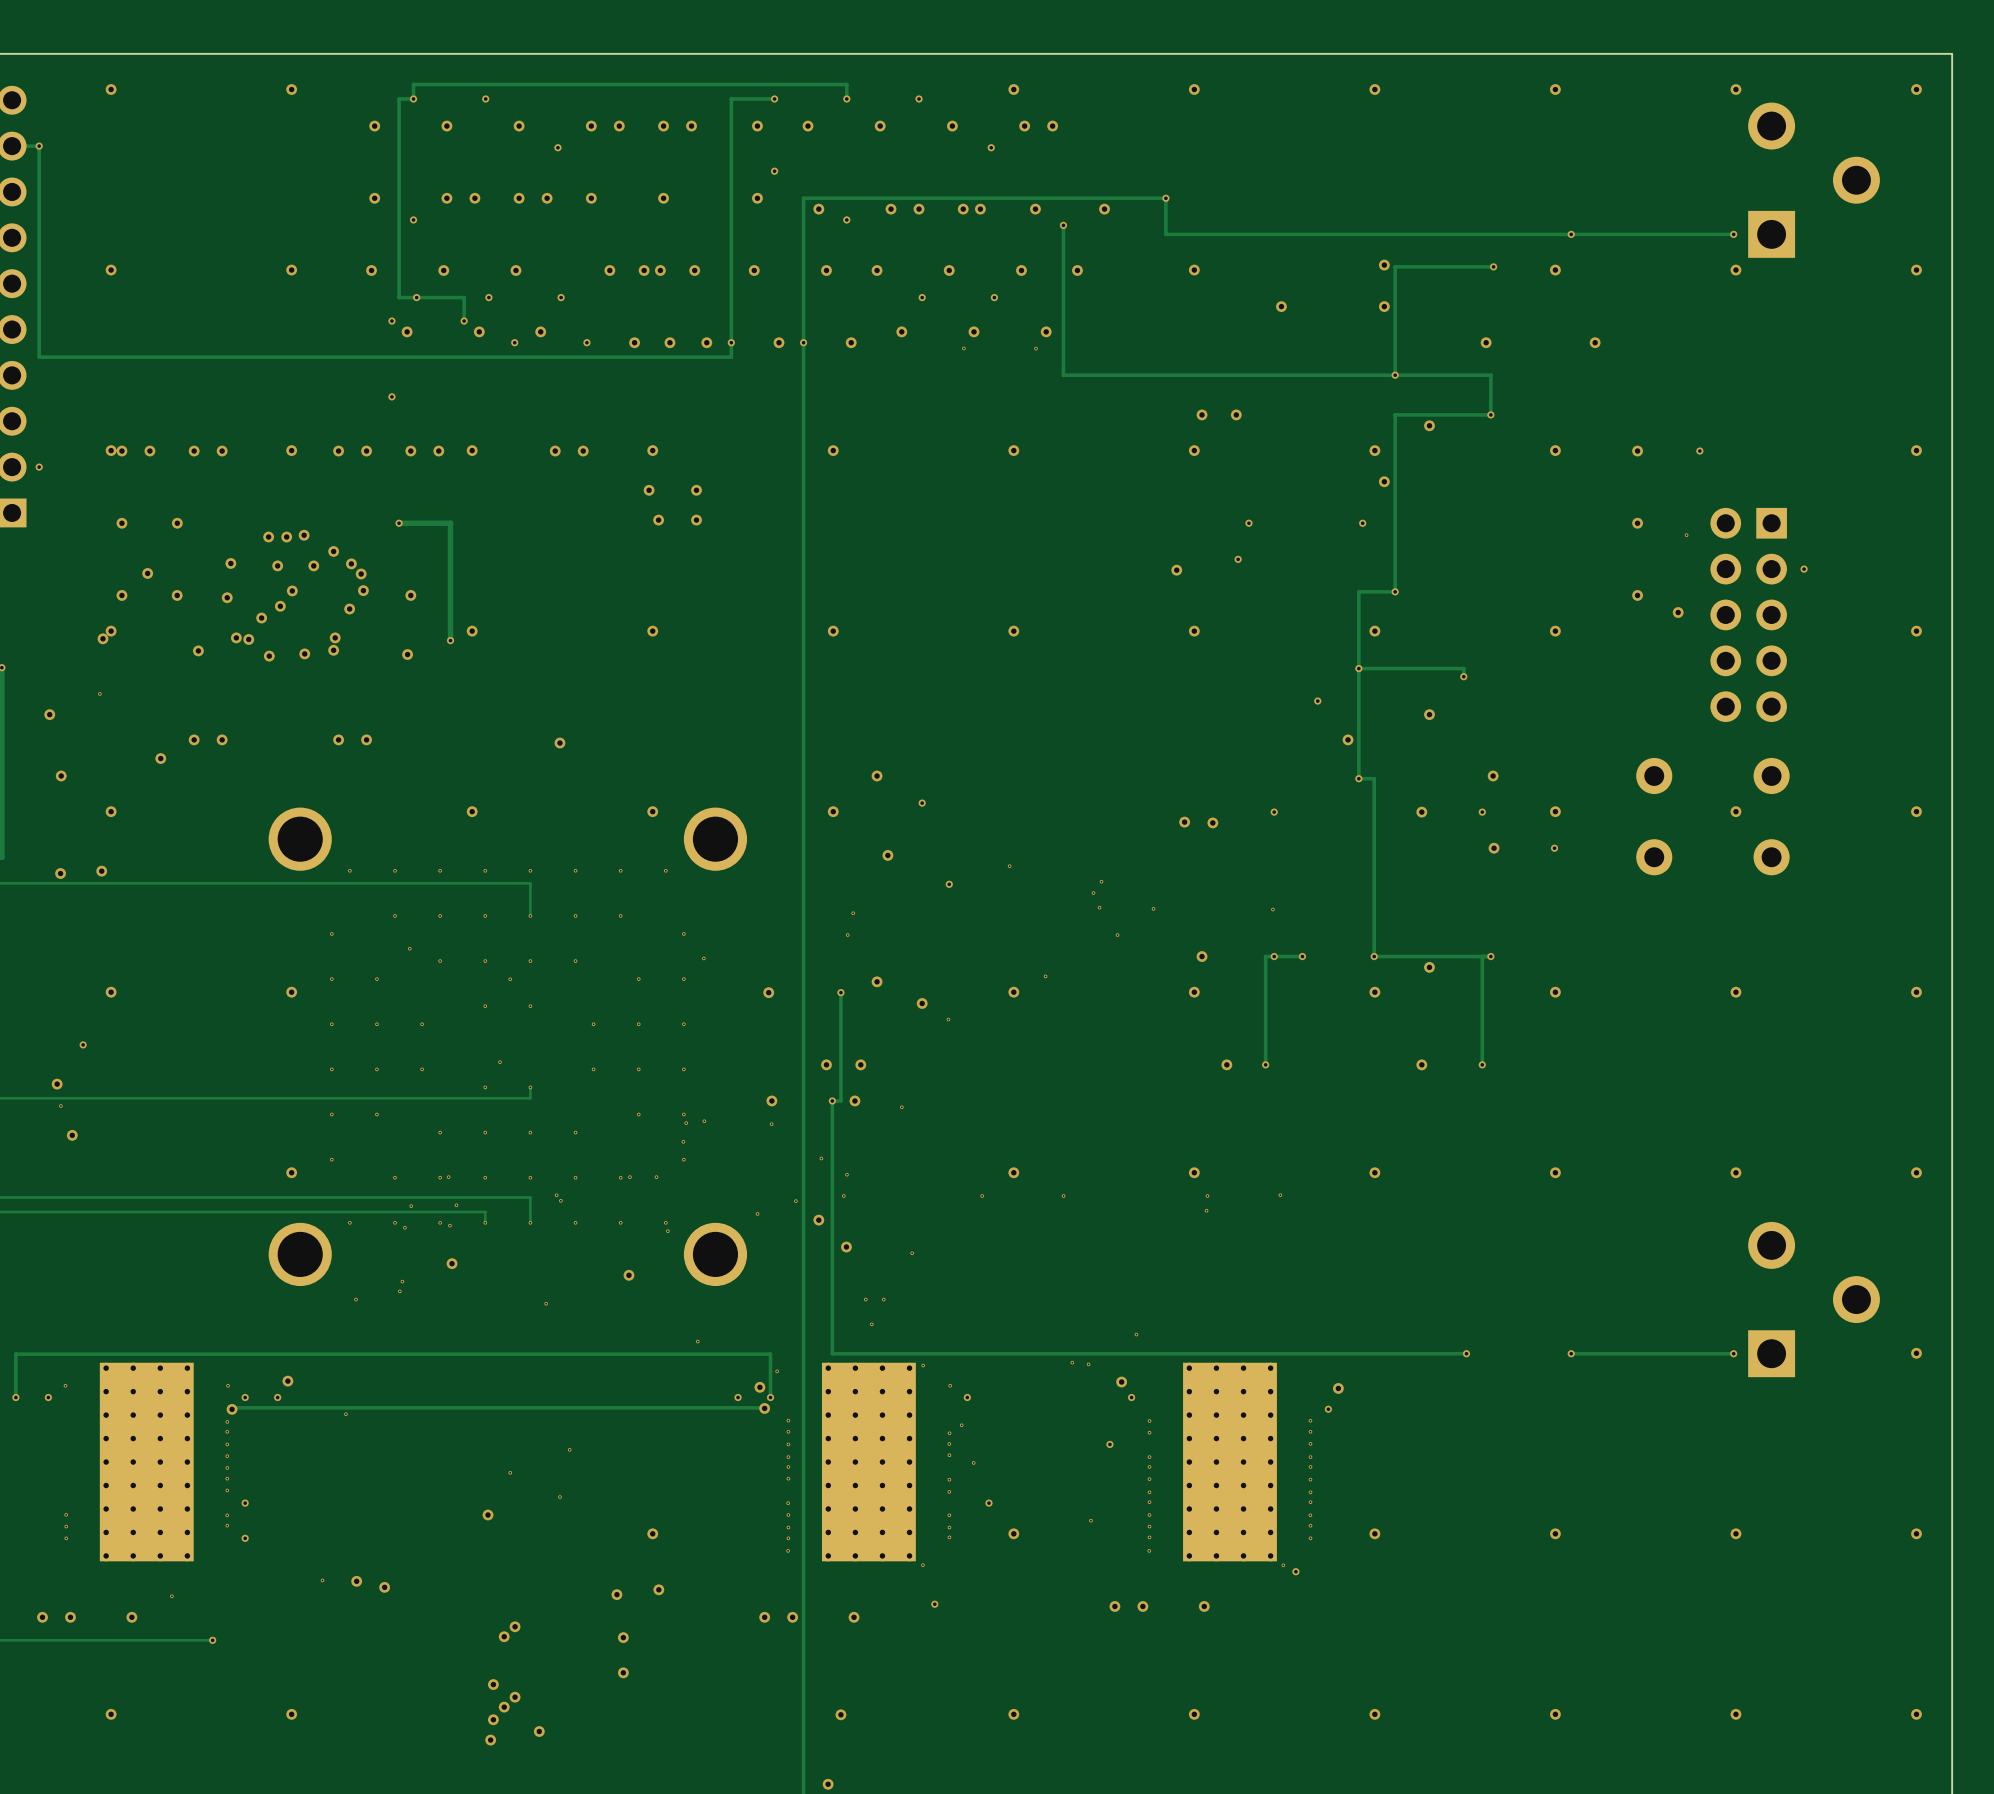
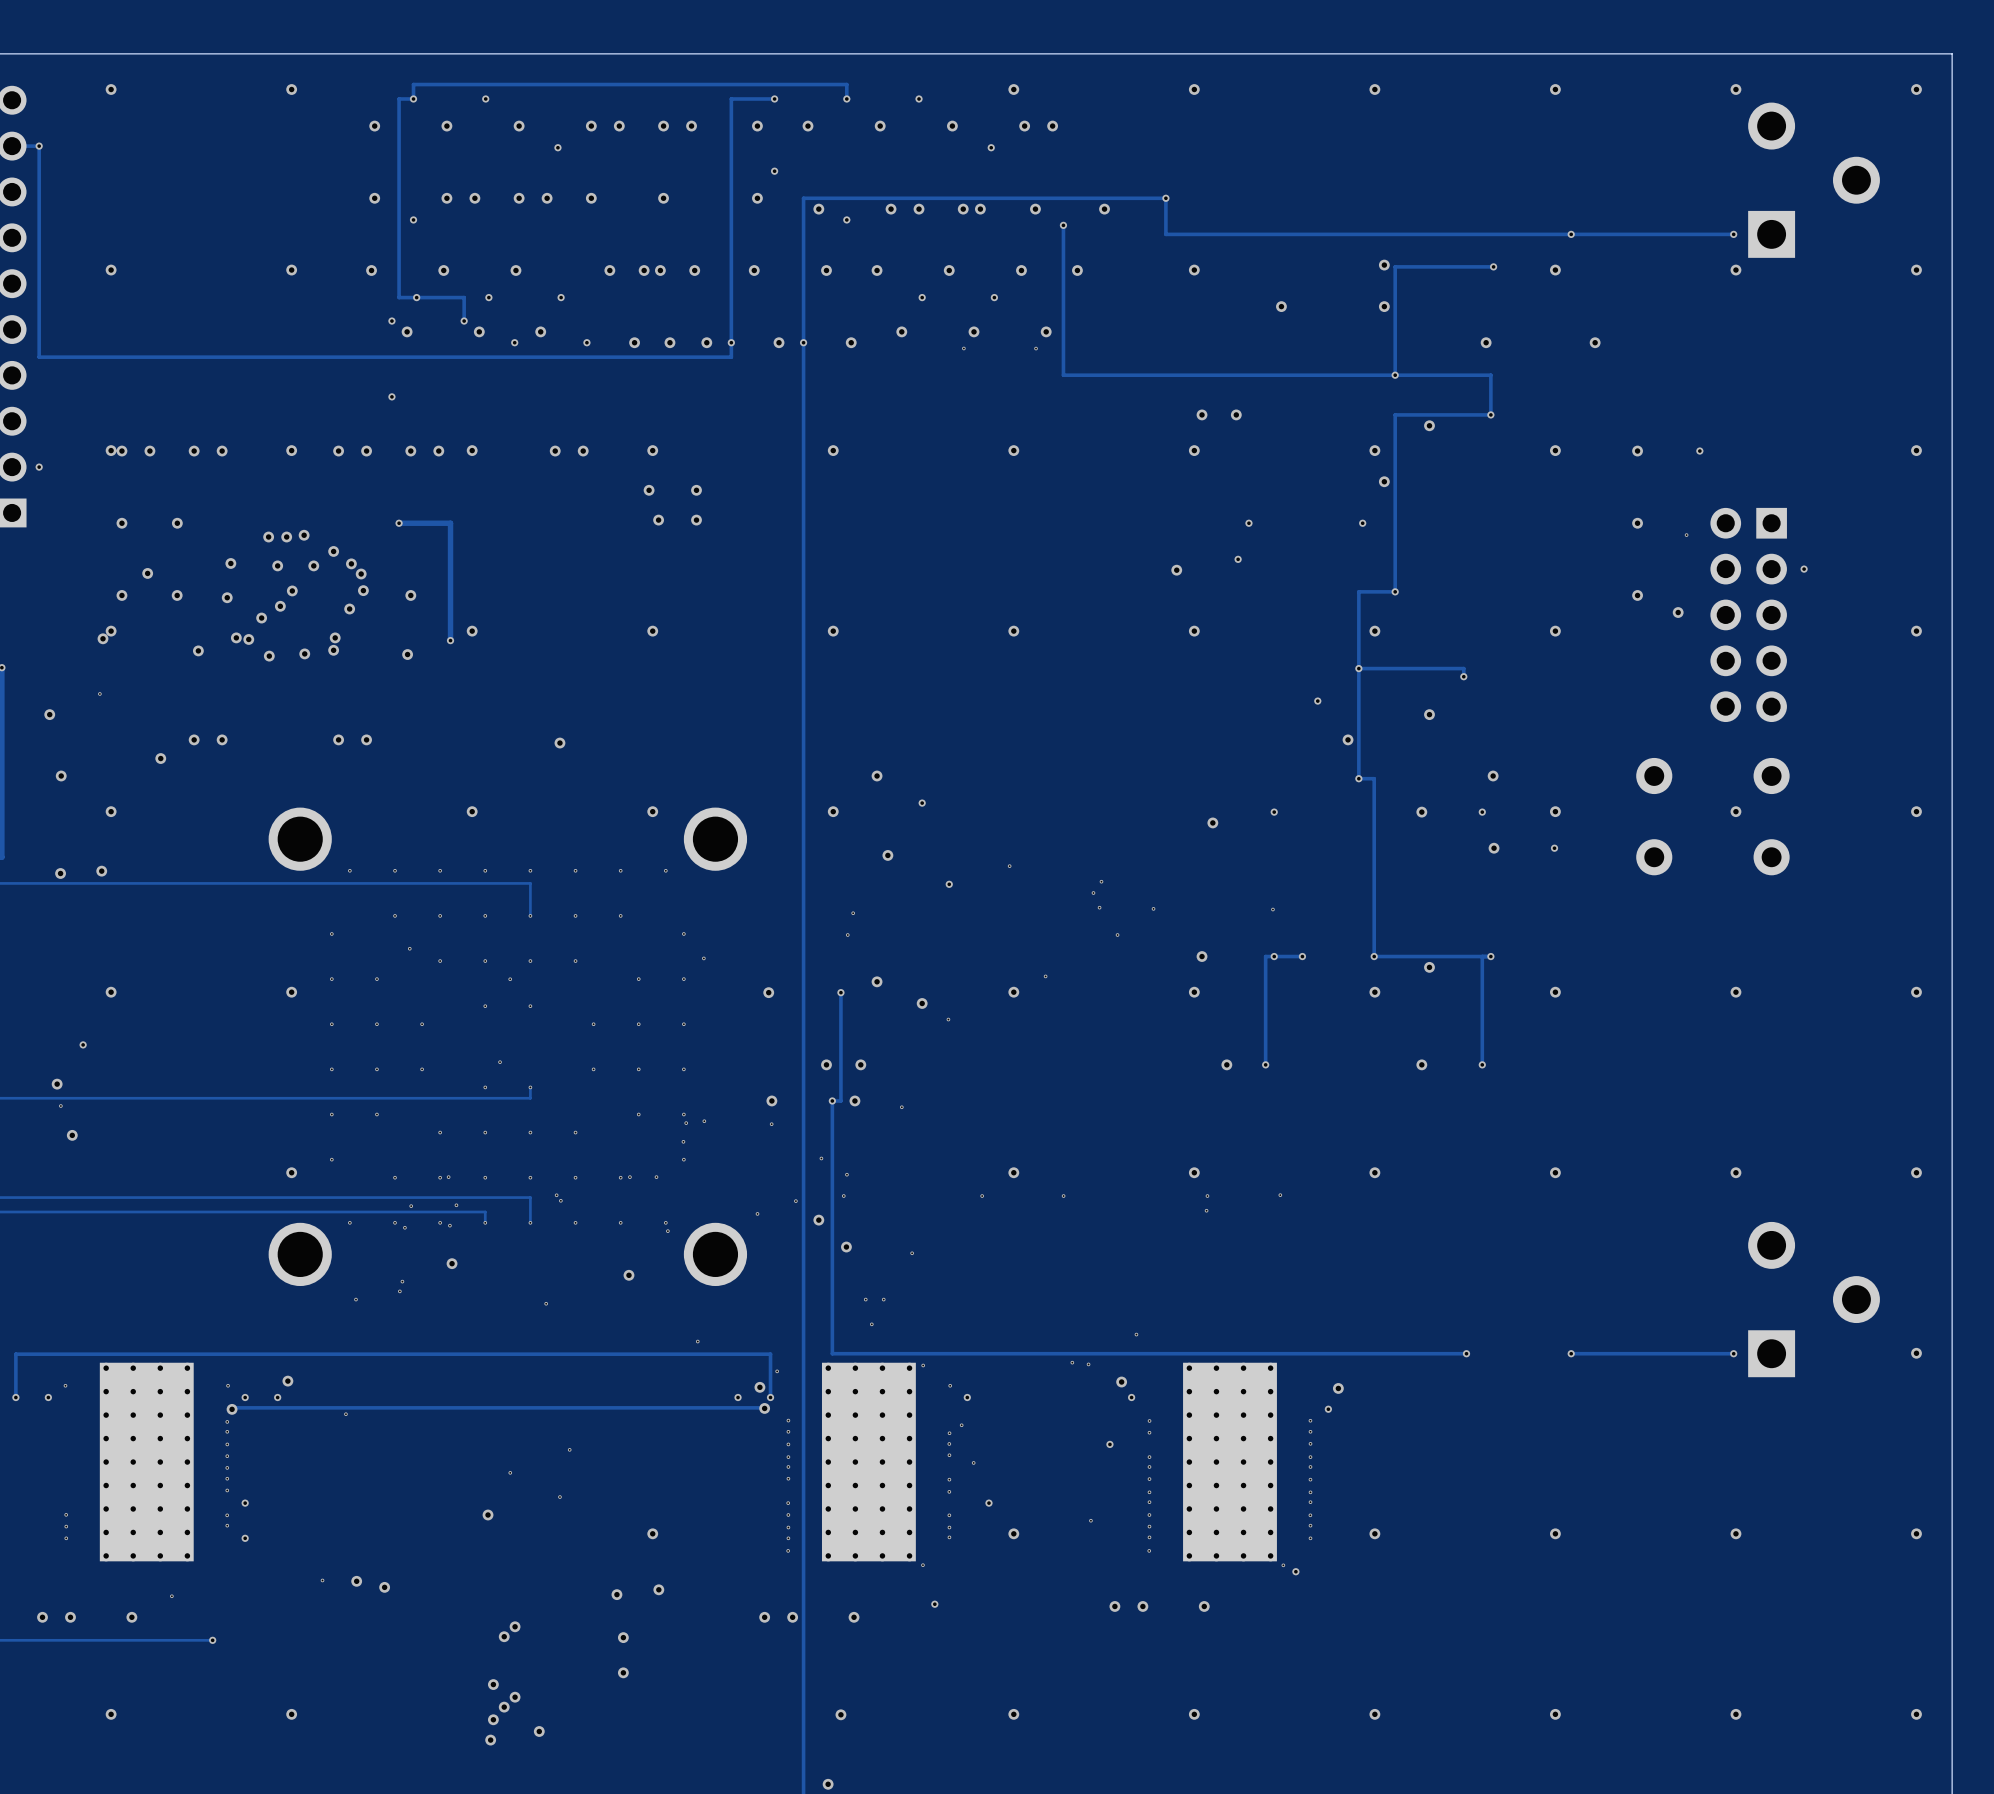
via: (1184, 822) -> none

